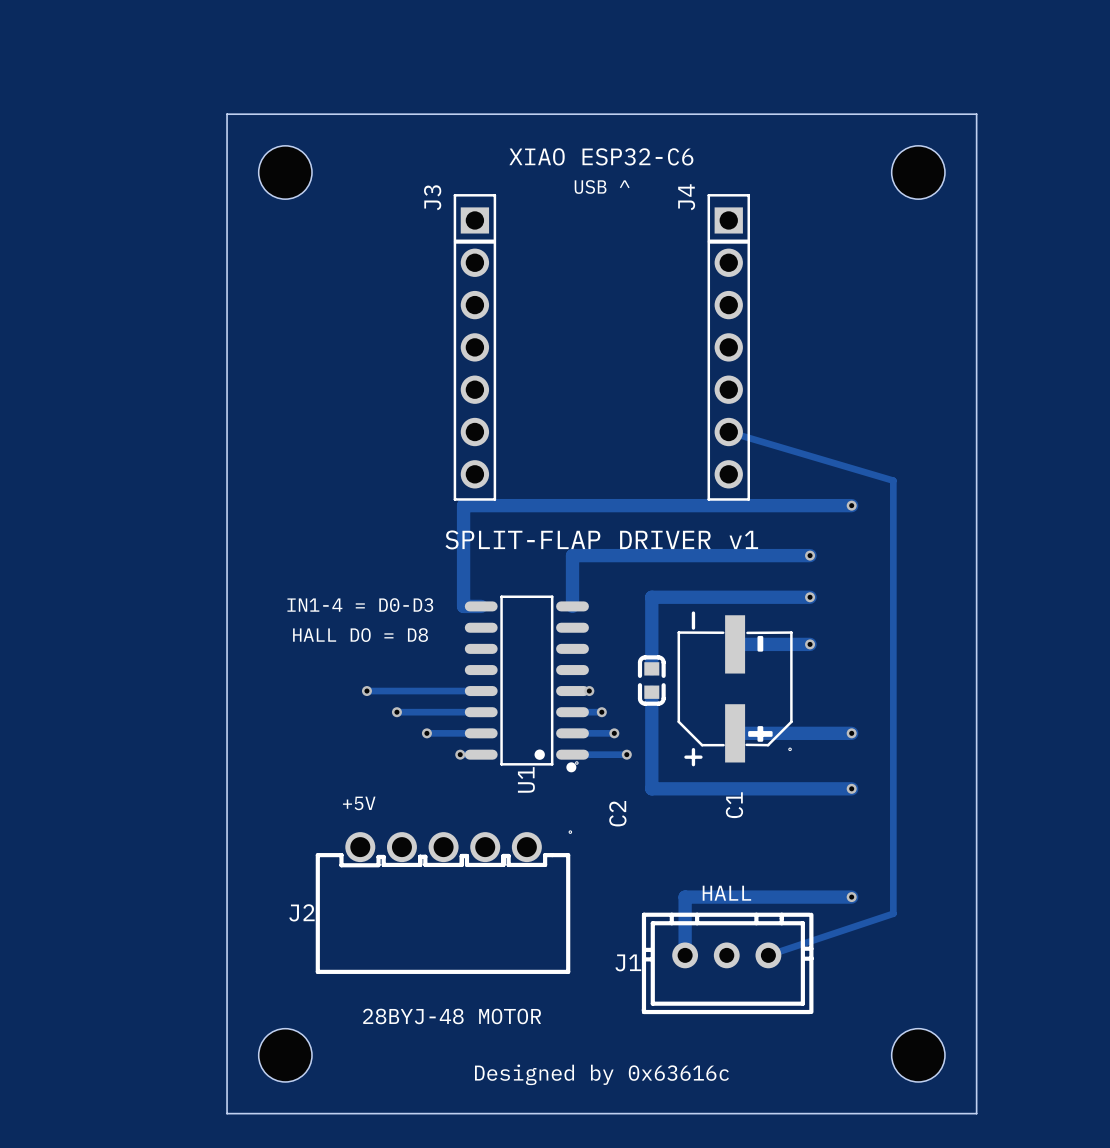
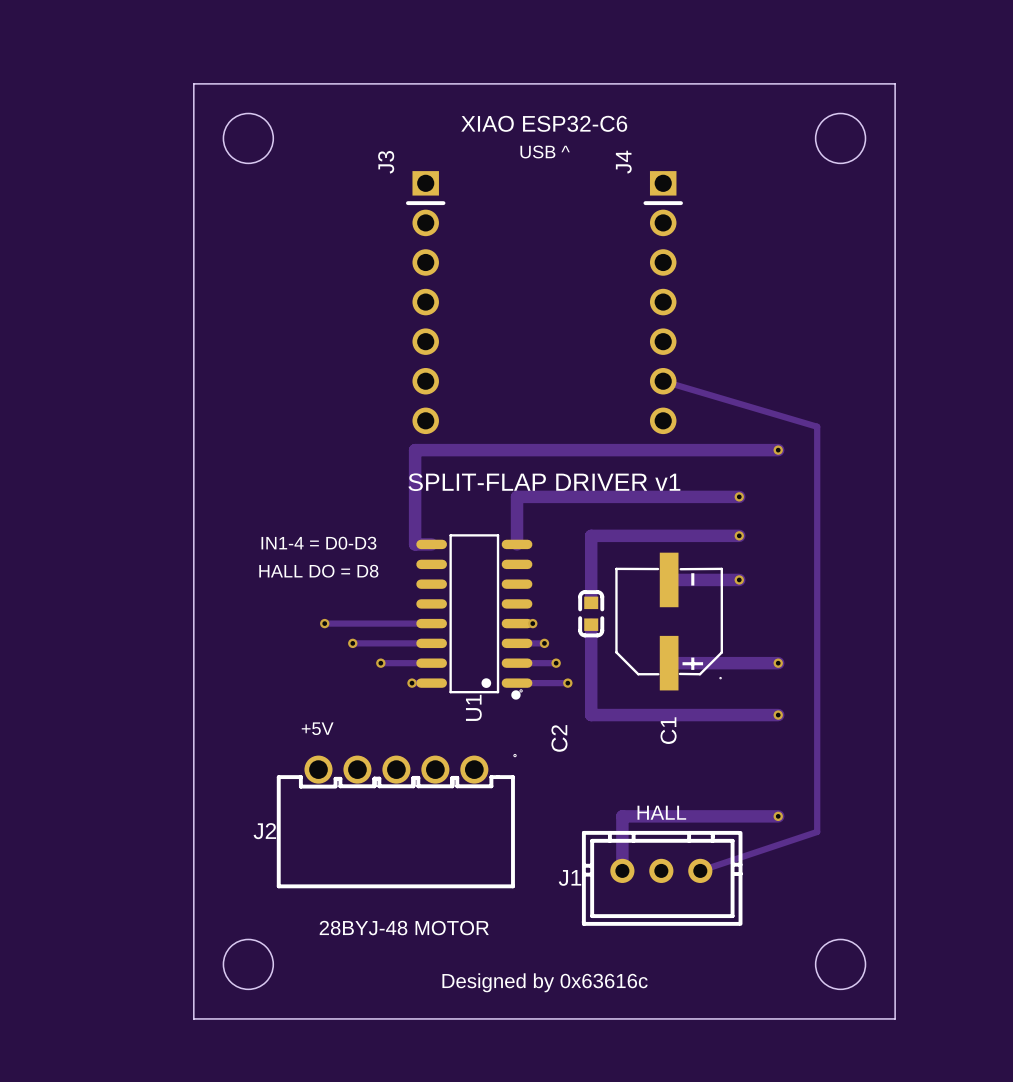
round board edge: none -> [222, 112, 275, 165]
round board edge: none -> [814, 112, 867, 165]
part: (285, 172) -> none
part: (918, 172) -> none
J3 footprint: [453, 194, 497, 501] -> [406, 171, 446, 435]
J4 footprint: [707, 194, 751, 501] -> [643, 171, 683, 435]
C1 footprint: [677, 611, 793, 767] -> [615, 552, 723, 691]
round board edge: none -> [222, 938, 275, 991]
round board edge: none -> [814, 938, 867, 991]
part: (285, 1055) -> none
part: (918, 1055) -> none

